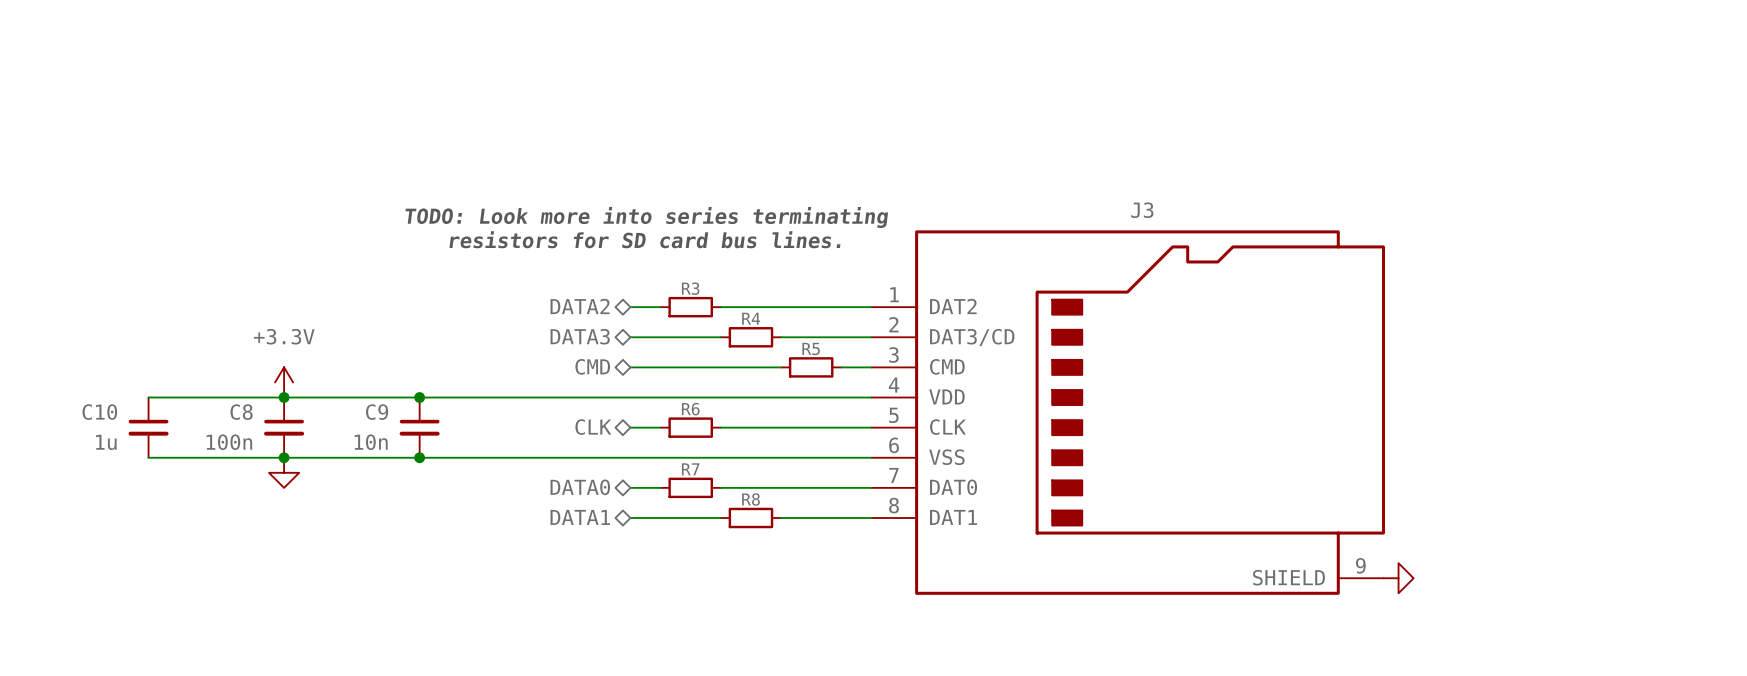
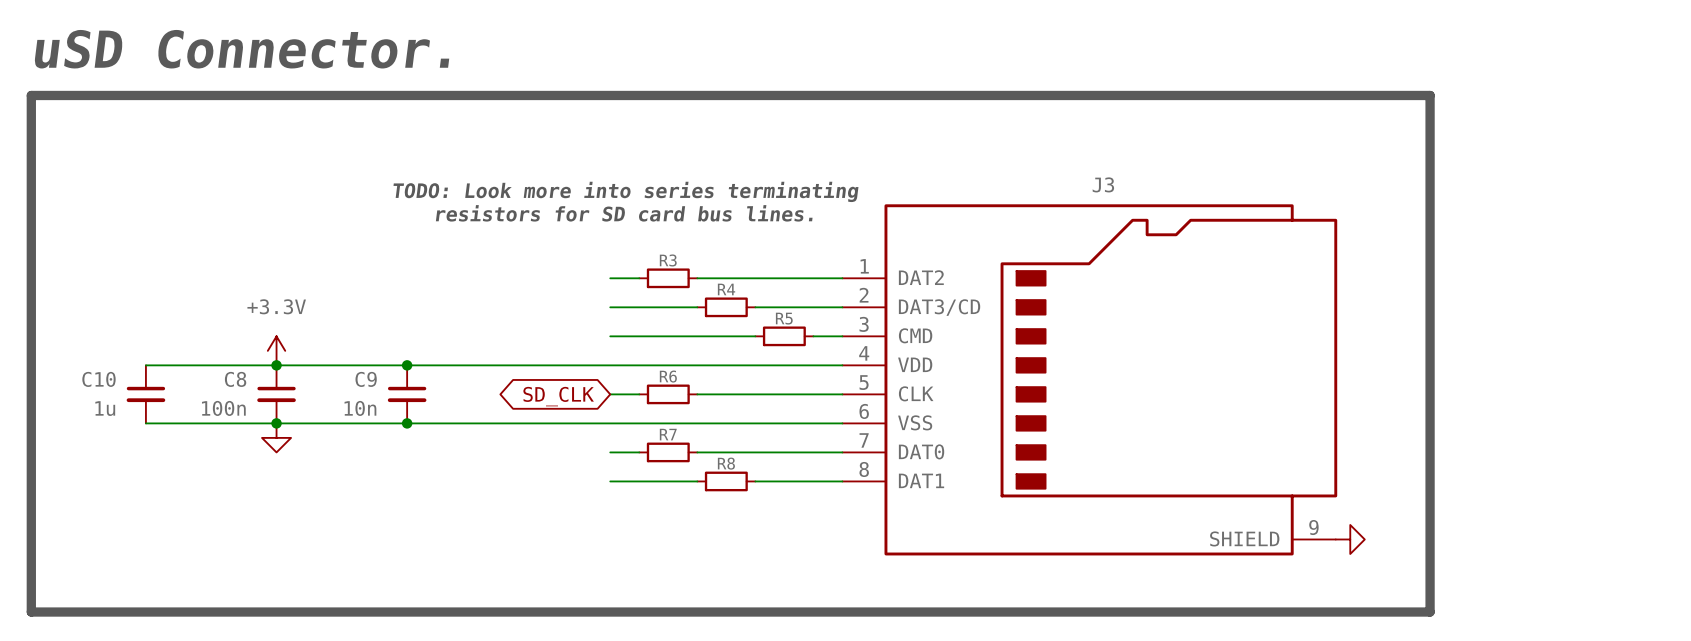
text: none -> uSD Connector. (241, 49)
line: none -> (31, 95) (1430, 95) (1430, 612) (31, 612) (31, 95)
hierarchical label: DATA2 (580, 306) -> none
hierarchical label: DATA3 (580, 336) -> none
hierarchical label: CMD (592, 366) -> none
hierarchical label: CLK (593, 427) -> none
global label: none -> SD_CLK (558, 396)
hierarchical label: DATA0 (580, 487) -> none
hierarchical label: DATA1 (580, 517) -> none

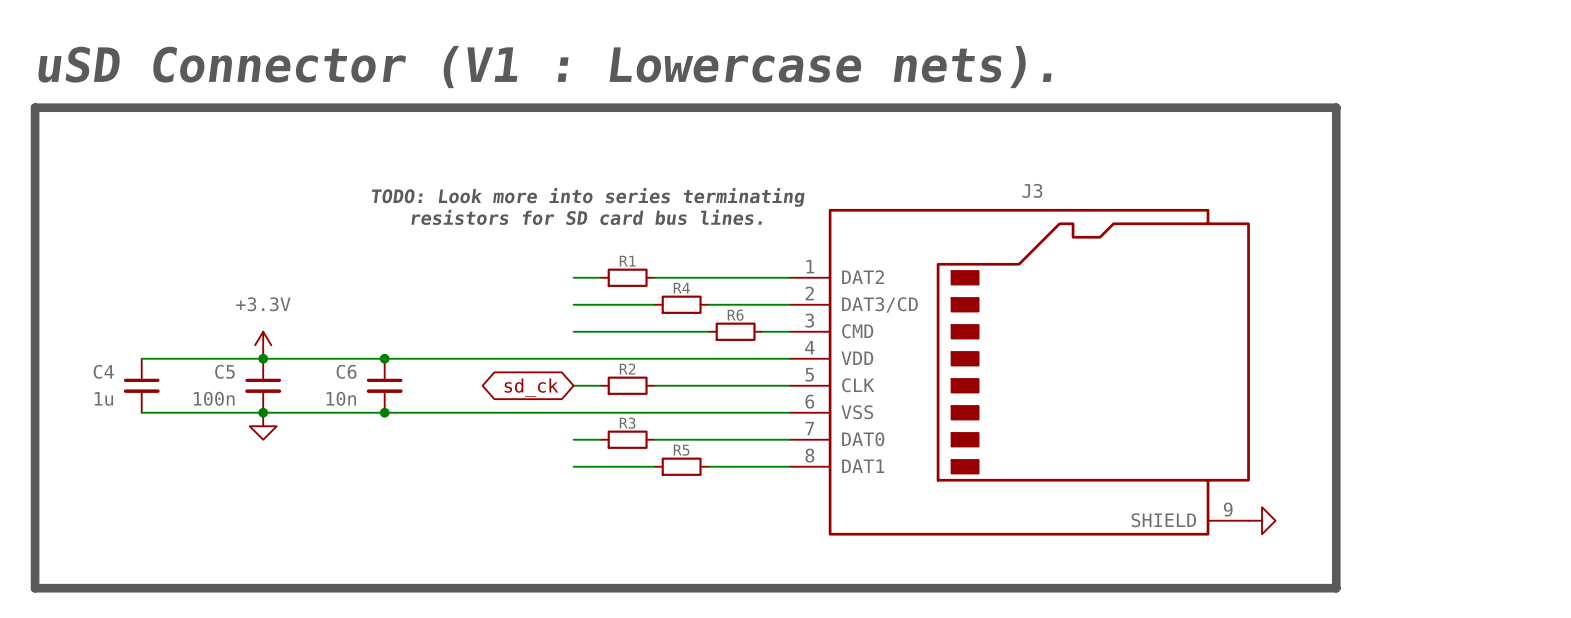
text: uSD Connector. (241, 49) -> uSD Connector (V1 : Lowercase nets). (544, 67)
R3 name: R3 (668, 260) -> R1 (627, 261)
R5 name: R5 (784, 318) -> R6 (735, 315)
R6 name: R6 (668, 376) -> R2 (627, 369)
C10 name: C10 (98, 379) -> C4 (103, 371)
C8 name: C8 (235, 379) -> C5 (224, 371)
C9 name: C9 (366, 379) -> C6 (346, 371)
global label: SD_CLK (558, 396) -> sd_ck (531, 387)
R7 name: R7 (668, 434) -> R3 (627, 423)
R8 name: R8 (726, 463) -> R5 (681, 450)

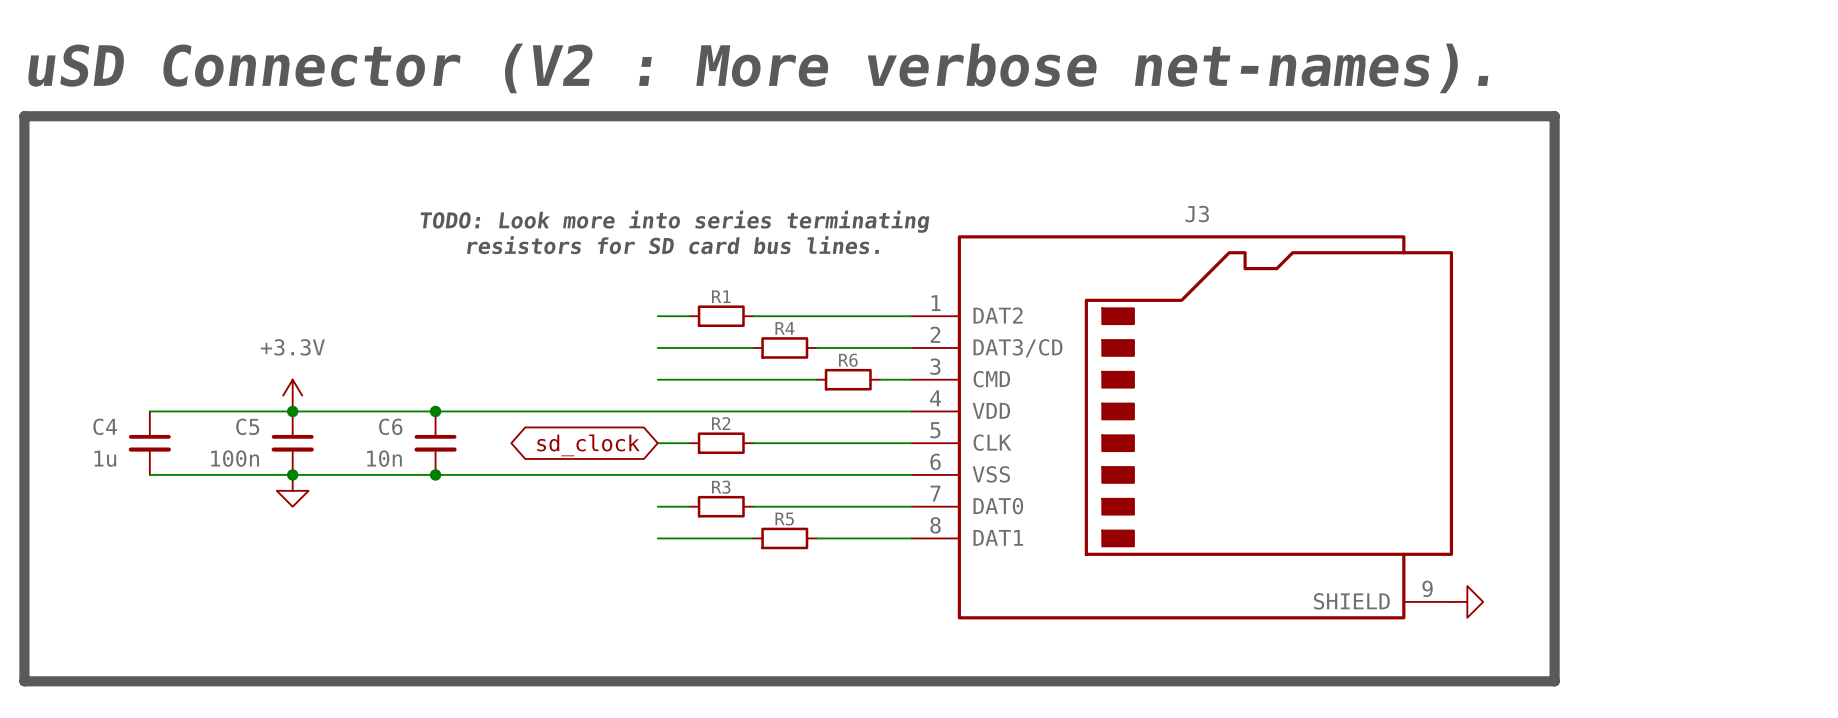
text: uSD Connector (V1 : Lowercase nets). (544, 67) -> uSD Connector (V2 : More verbose net-names). (758, 68)
global label: sd_ck (531, 387) -> sd_clock (588, 445)

